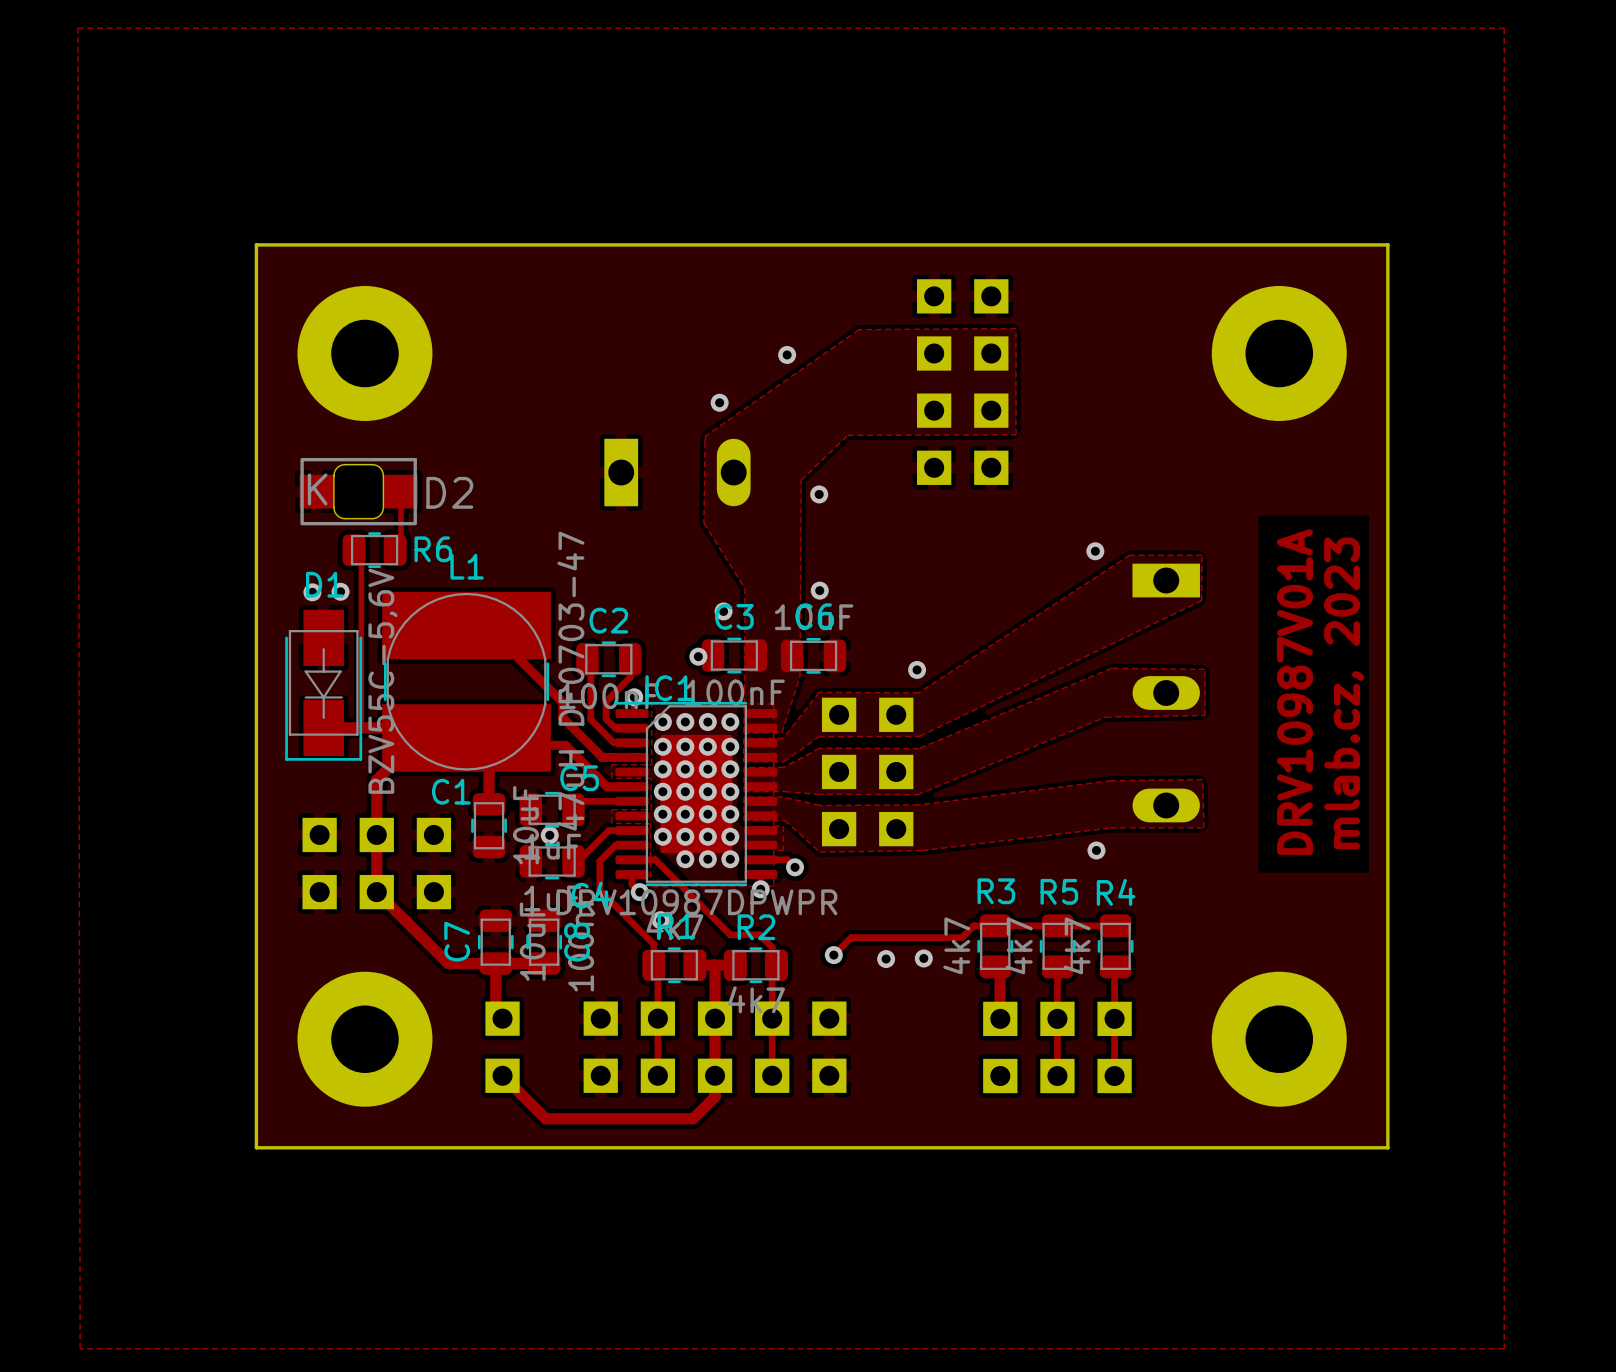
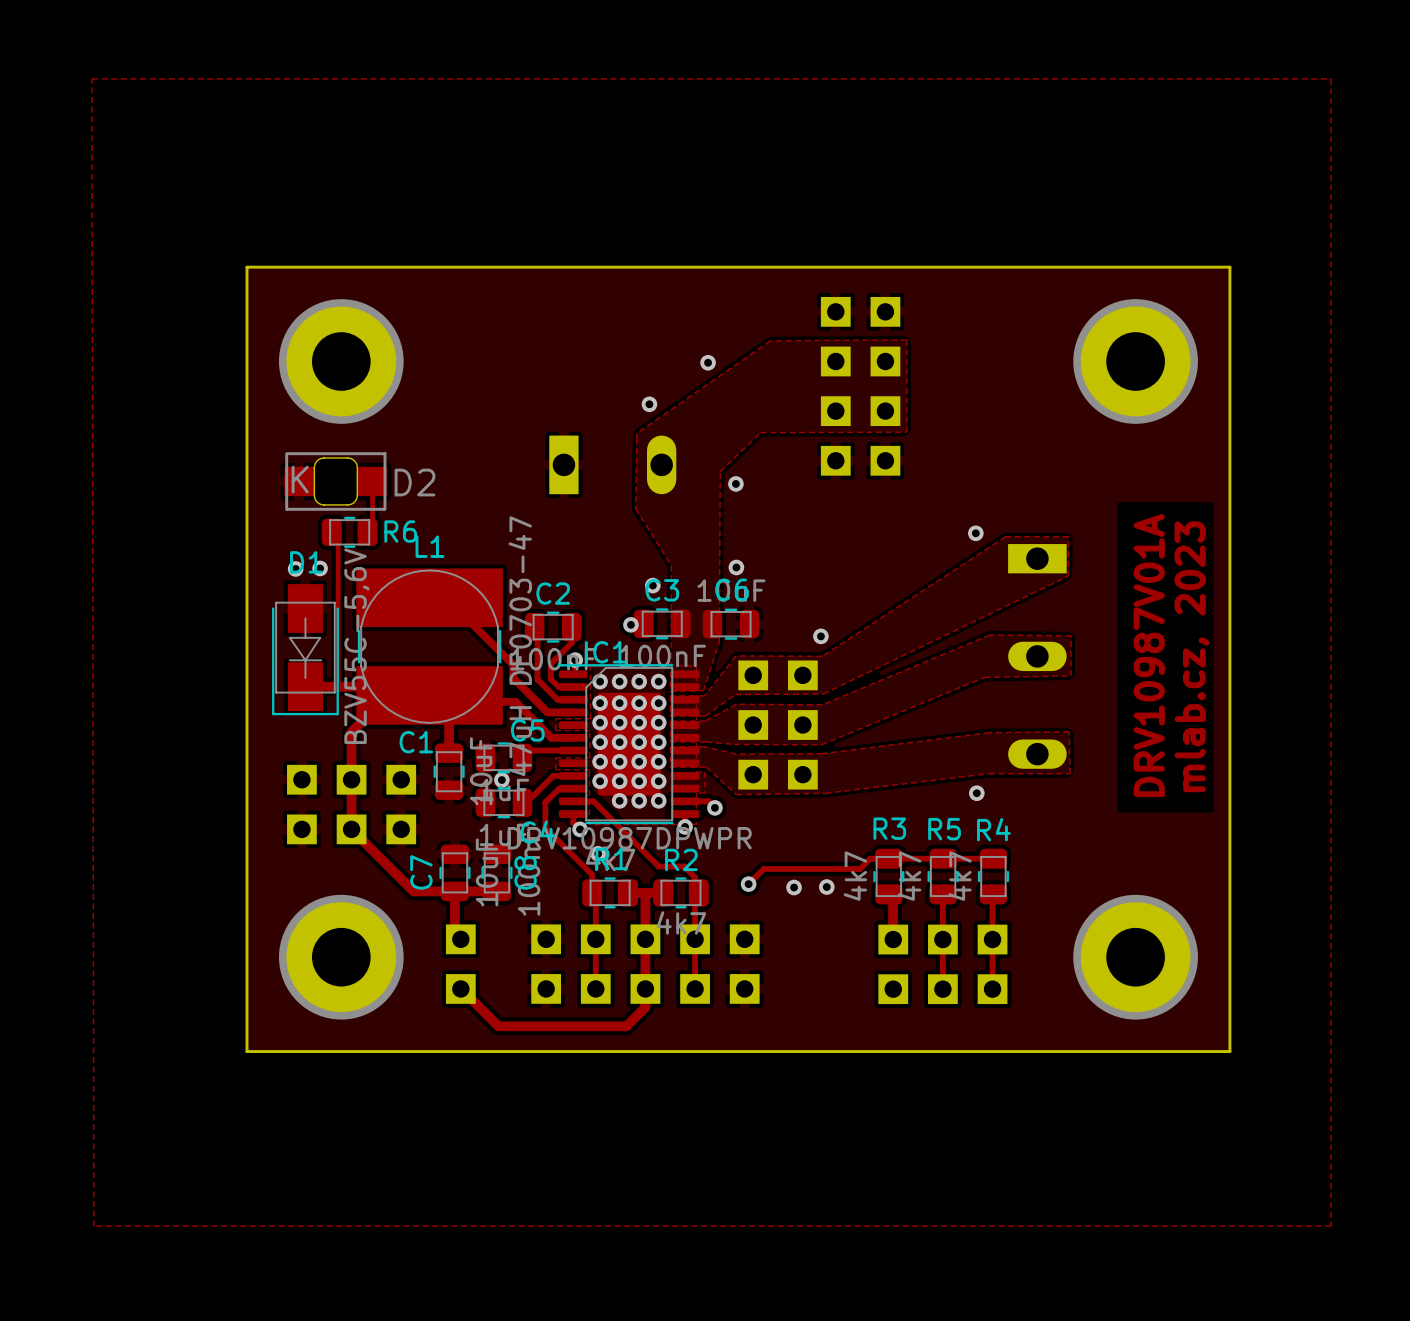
part side: bottom (364, 353) -> top (341, 361)
part side: bottom (1279, 353) -> top (1135, 361)
part side: bottom (364, 1039) -> top (341, 957)
part side: bottom (1279, 1039) -> top (1135, 957)

